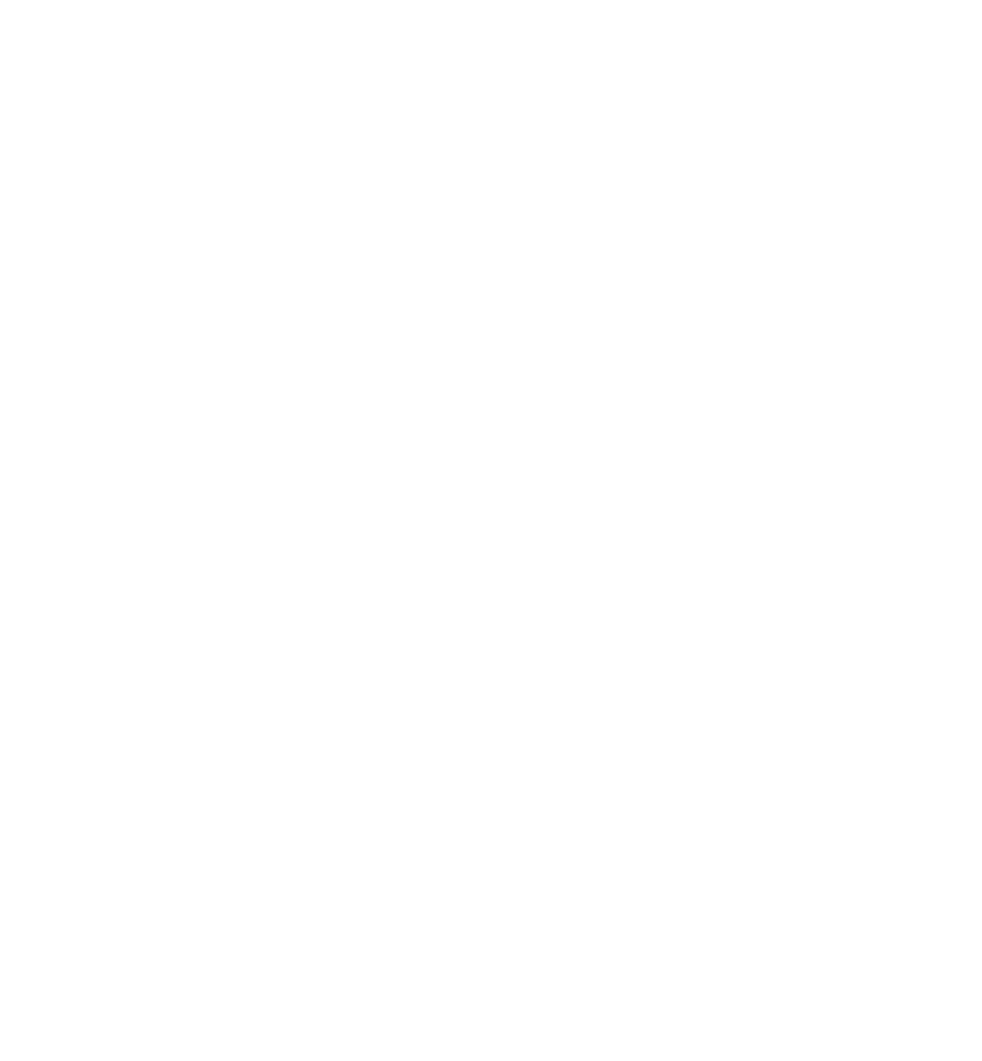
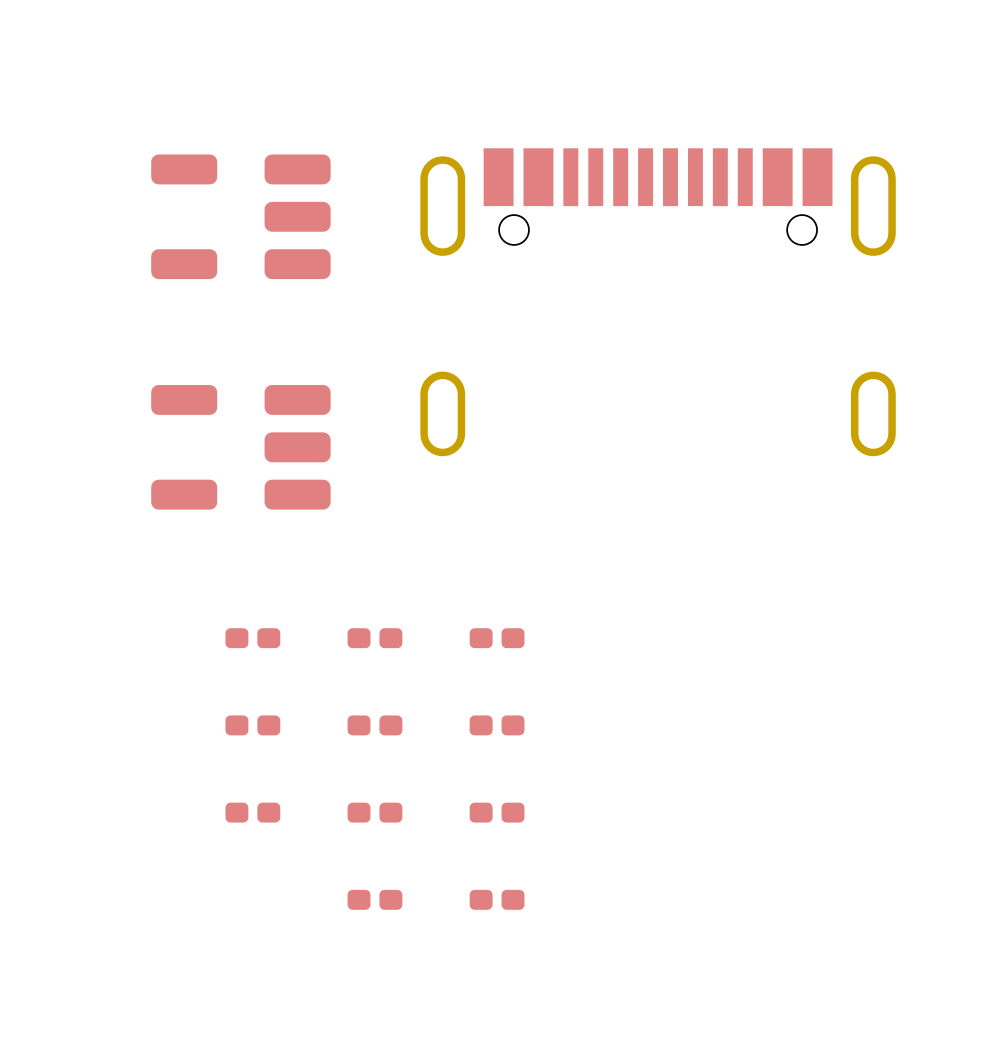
part: none -> (240, 216)
part: none -> (658, 302)
part: none -> (240, 447)
part: none -> (252, 638)
part: none -> (374, 638)
part: none -> (497, 638)
part: none -> (252, 725)
part: none -> (374, 725)
part: none -> (497, 725)
part: none -> (252, 812)
part: none -> (374, 812)
part: none -> (497, 812)
part: none -> (374, 899)
part: none -> (497, 899)

